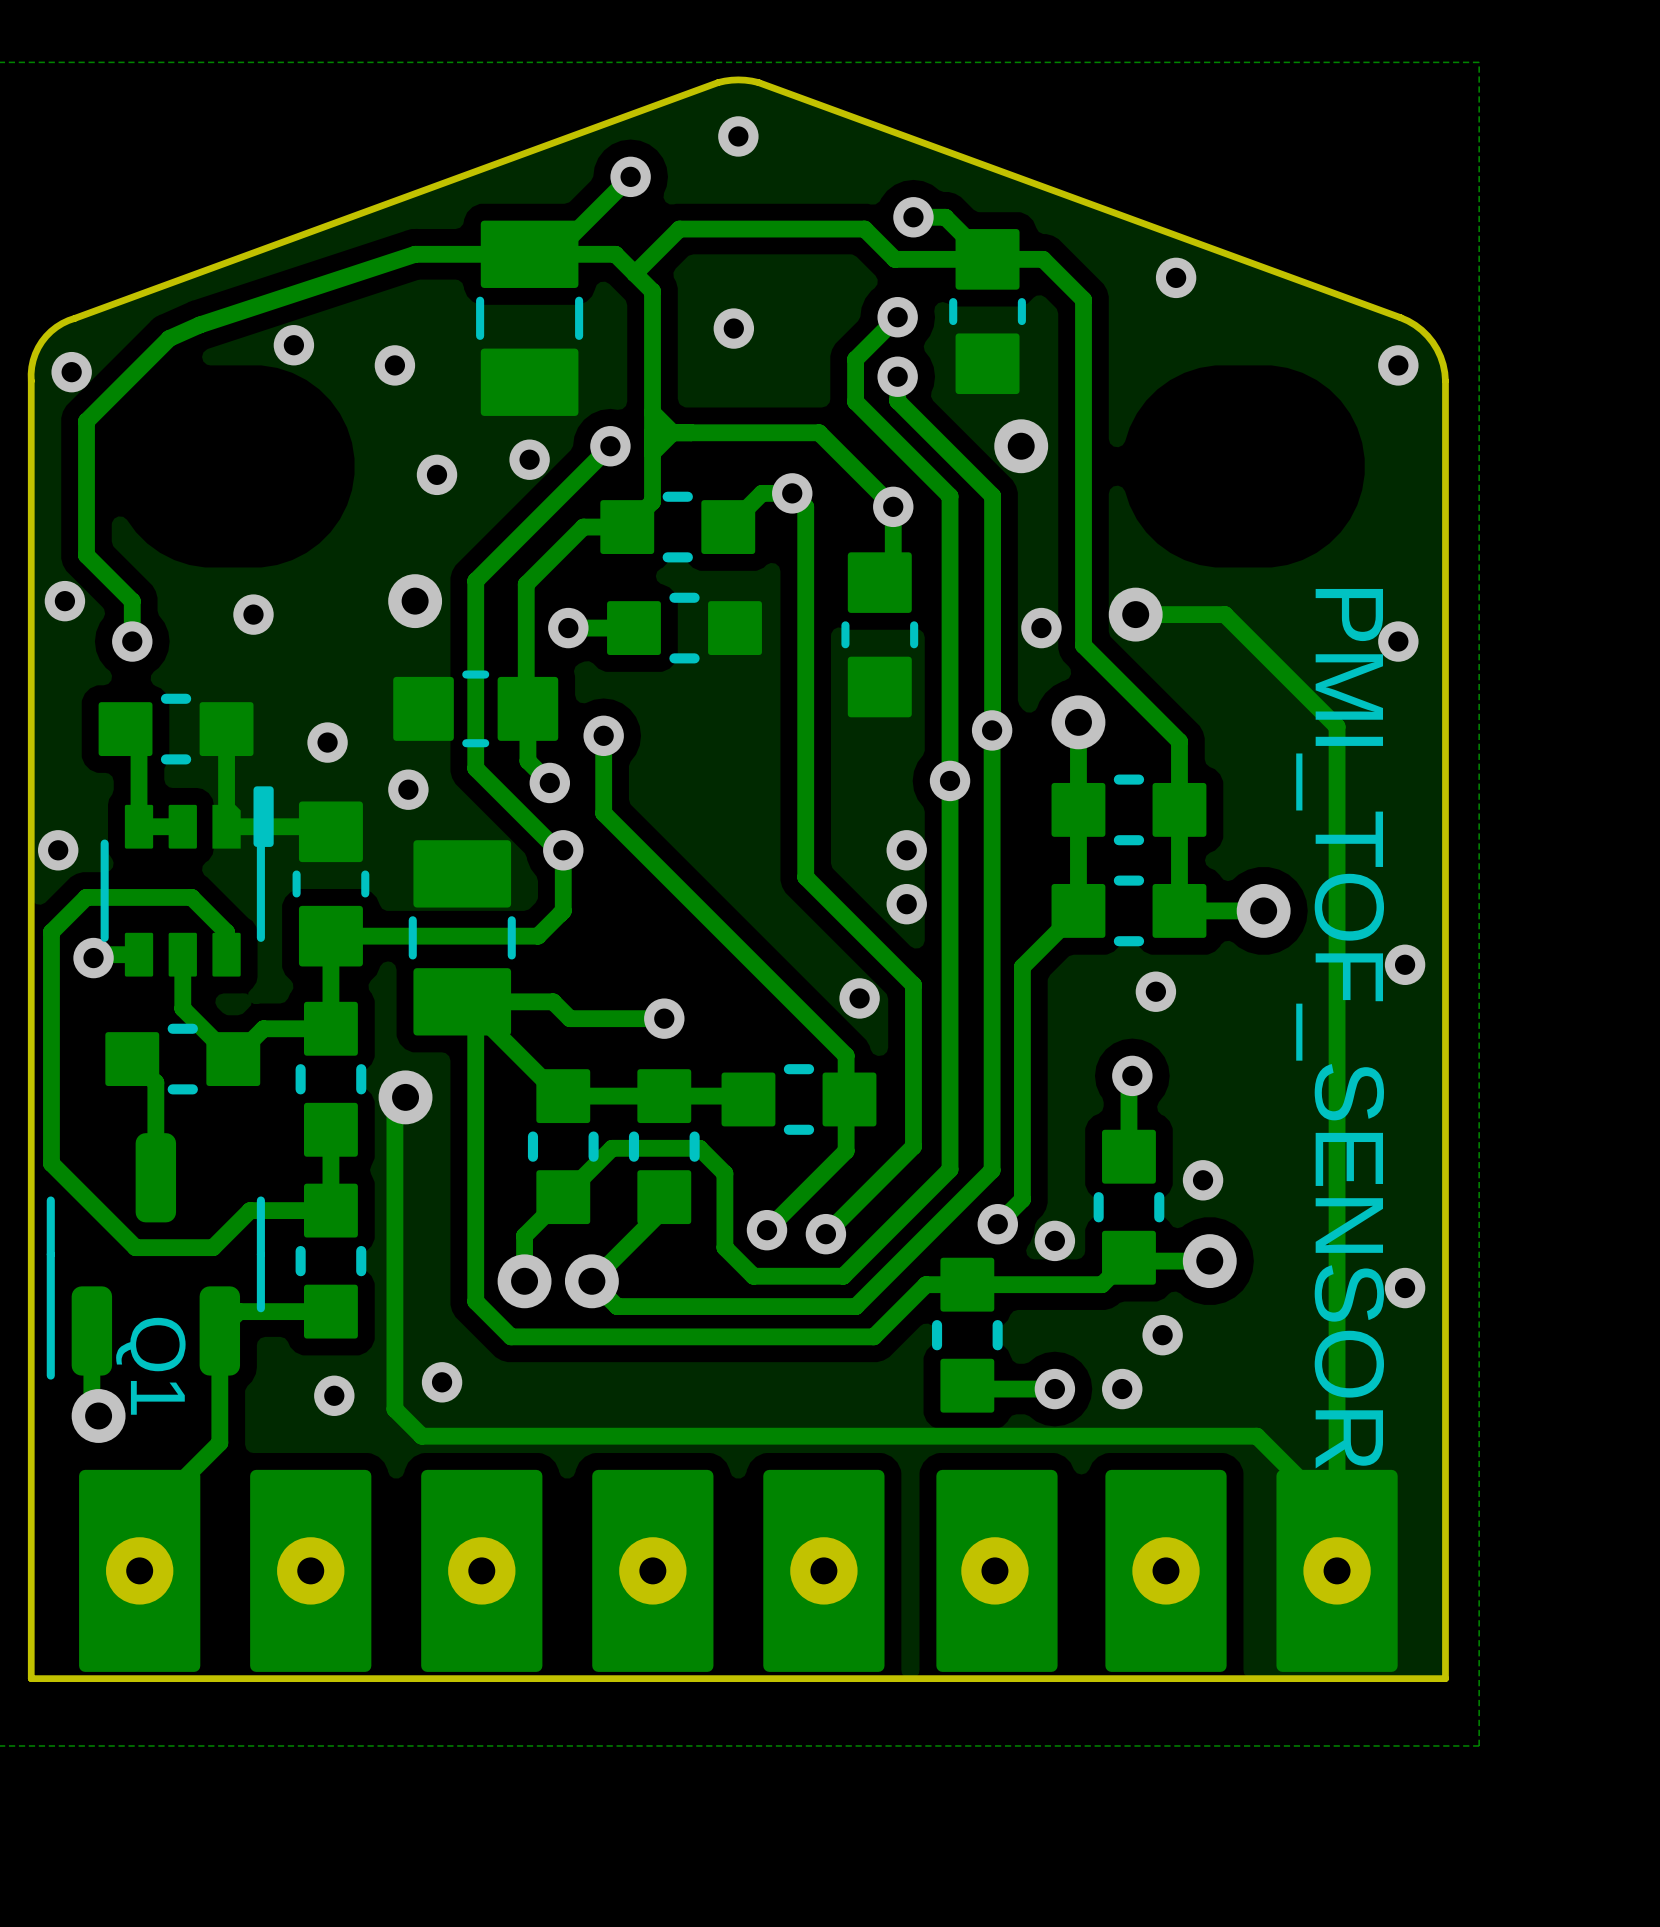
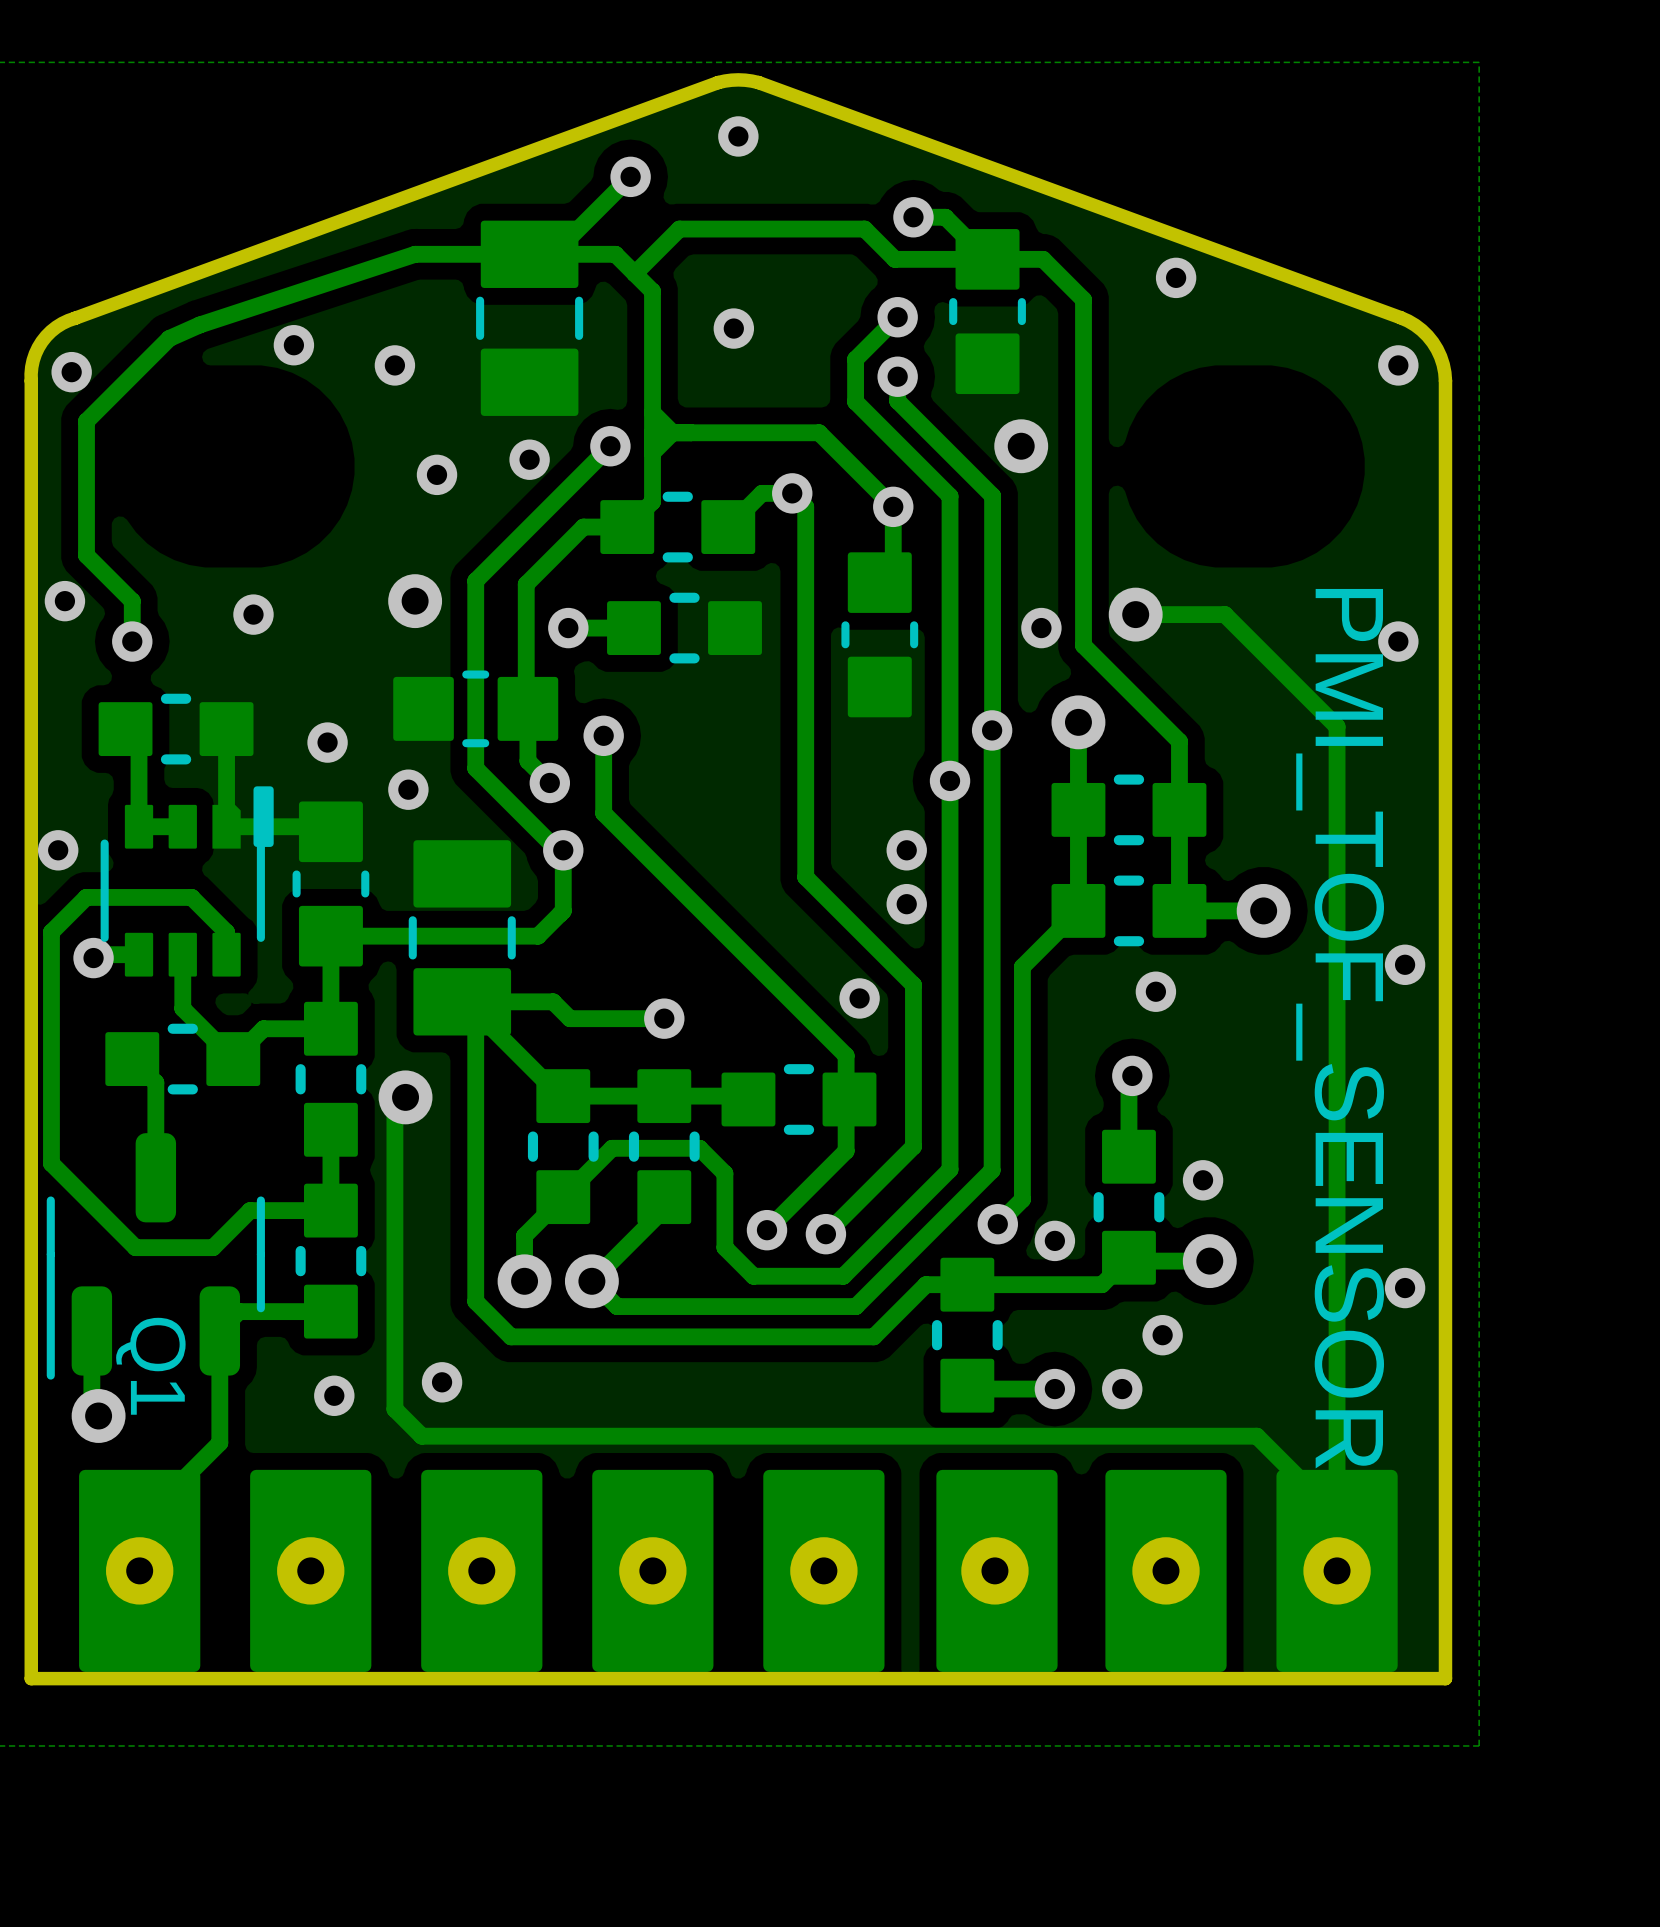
board edge width: thin (758, 82) (1400, 317) (1421, 330) (1432, 342) (1440, 356) (1445, 380) (1445, 1678) (31, 1678) (31, 374) (35, 353) (46, 336) (56, 327) (68, 320) (718, 82) (738, 79) (758, 82) -> thick (758, 82) (1400, 317) (1421, 330) (1432, 342) (1440, 356) (1445, 380) (1445, 1678) (31, 1678) (31, 374) (35, 353) (46, 336) (56, 327) (68, 320) (718, 82) (738, 79) (758, 82)

